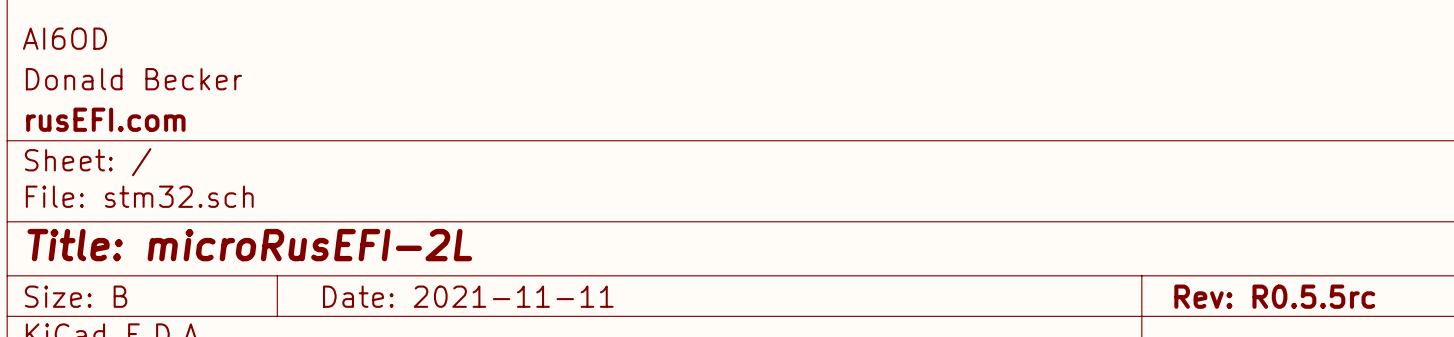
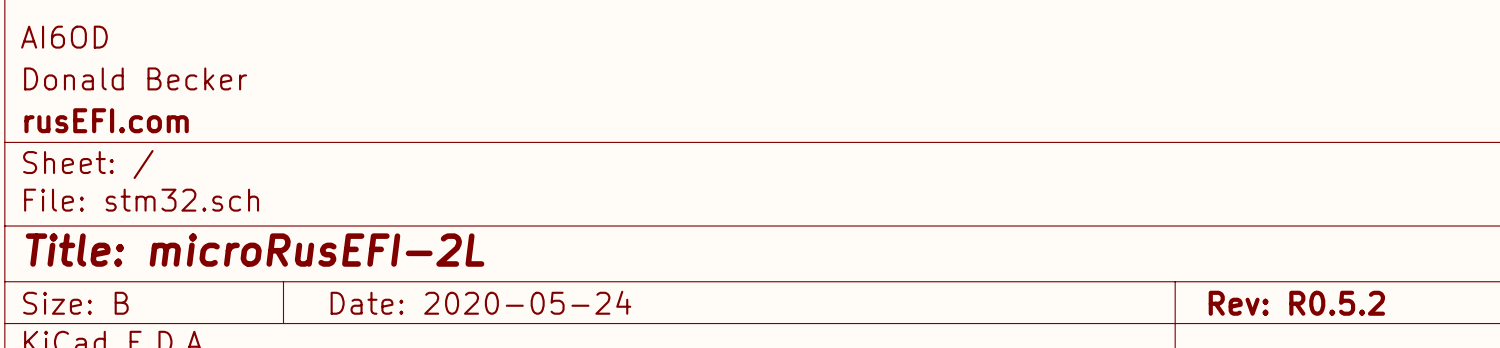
title block: Date: 2021-11-11 (468, 296) -> Date: 2020-05-24 (480, 302)
title block: Rev: R0.5.5rc (1274, 296) -> Rev: R0.5.2 (1296, 303)

